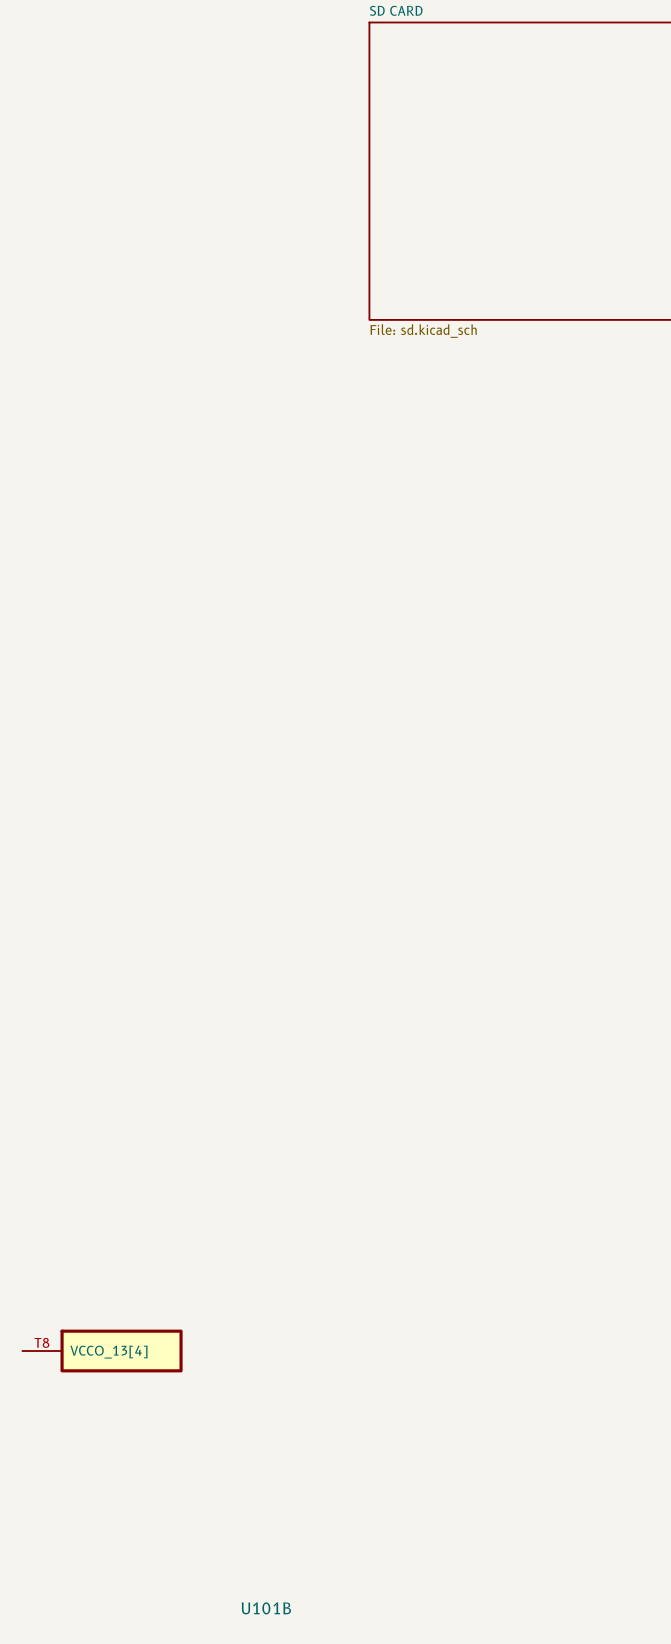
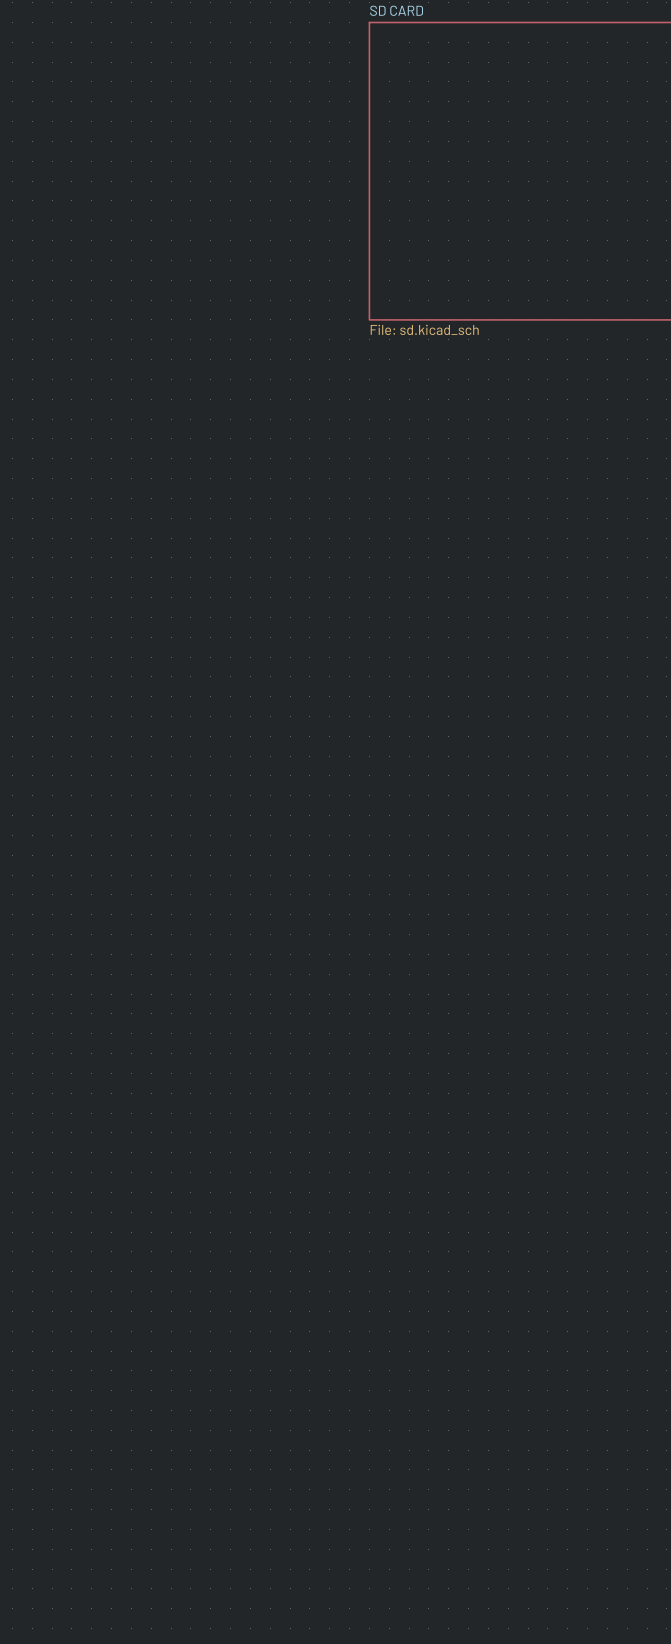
U101B: (102, 1351) -> none

